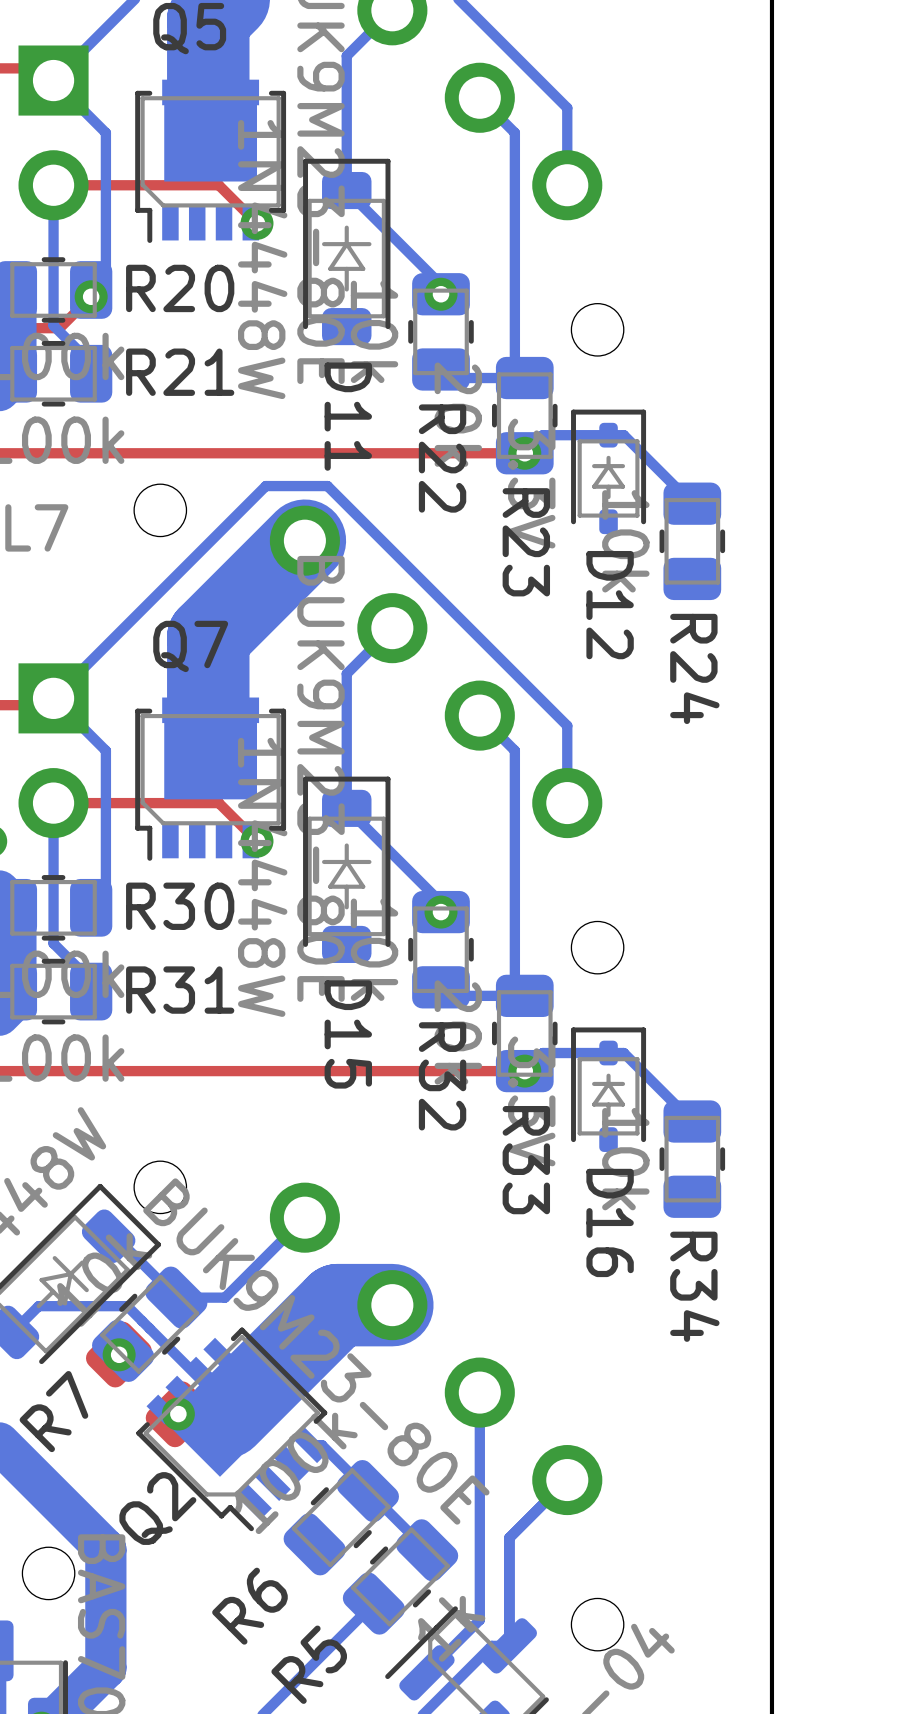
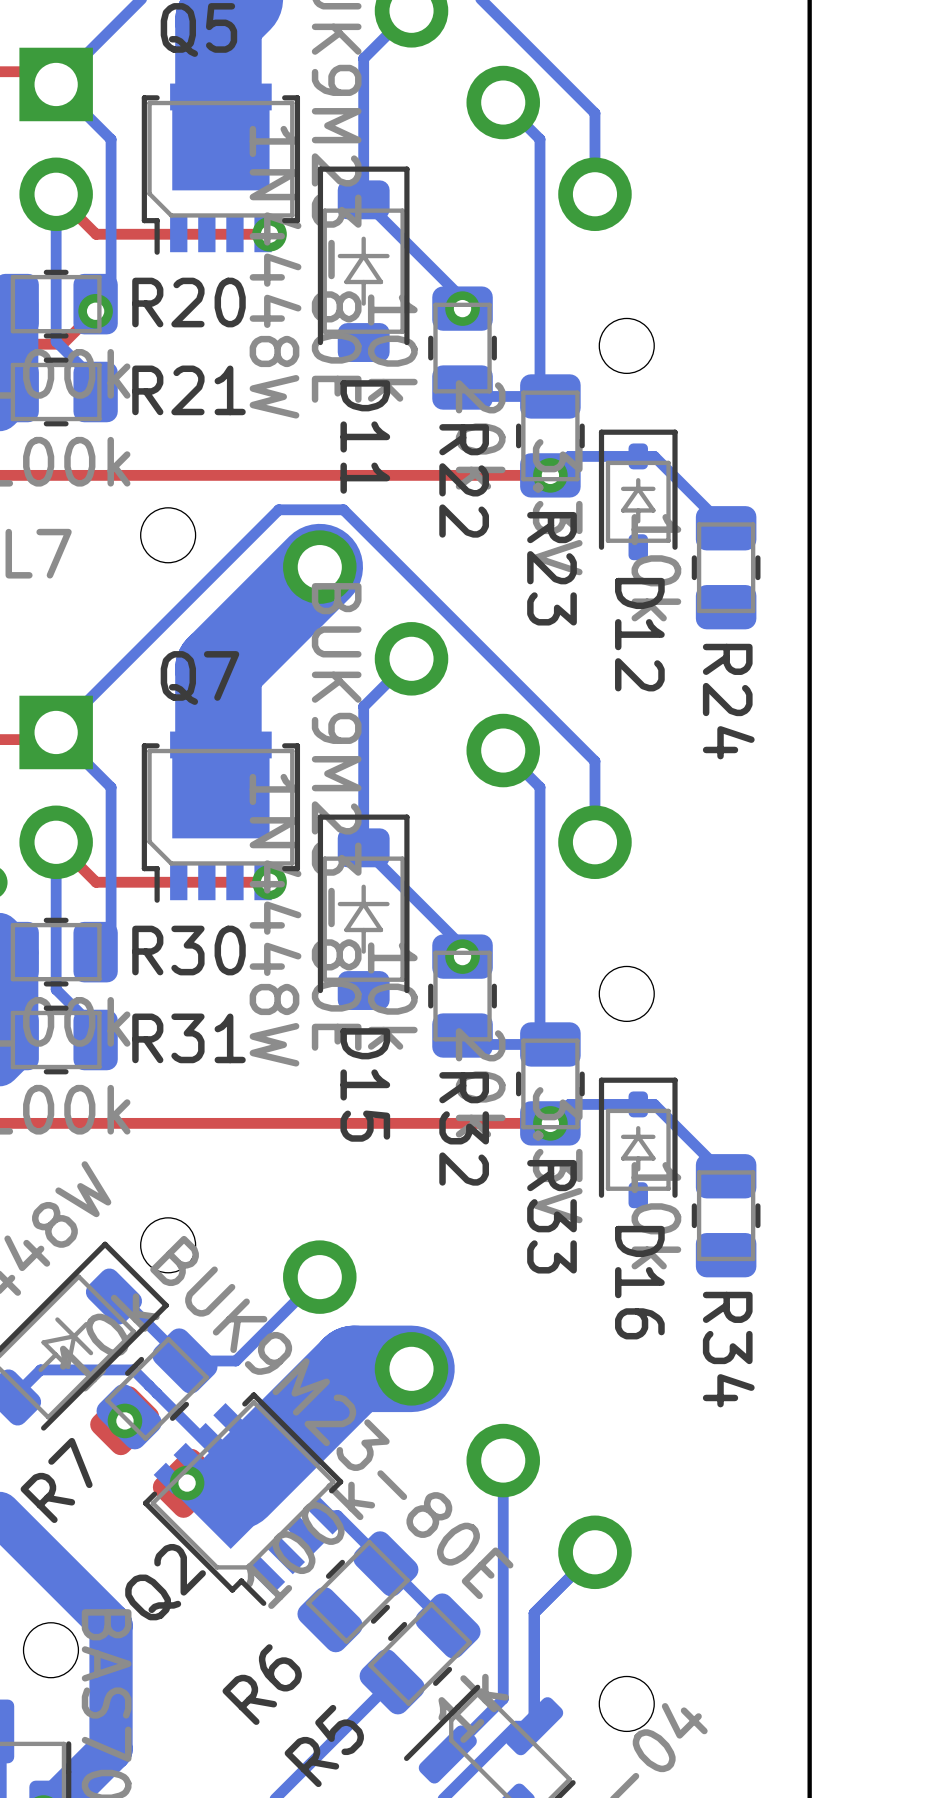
top track: (53, 185) (218, 185) (256, 223) -> (56, 194) (96, 234) (269, 234)
top track: (53, 803) (218, 803) (256, 841) -> (56, 842) (96, 882) (269, 882)

